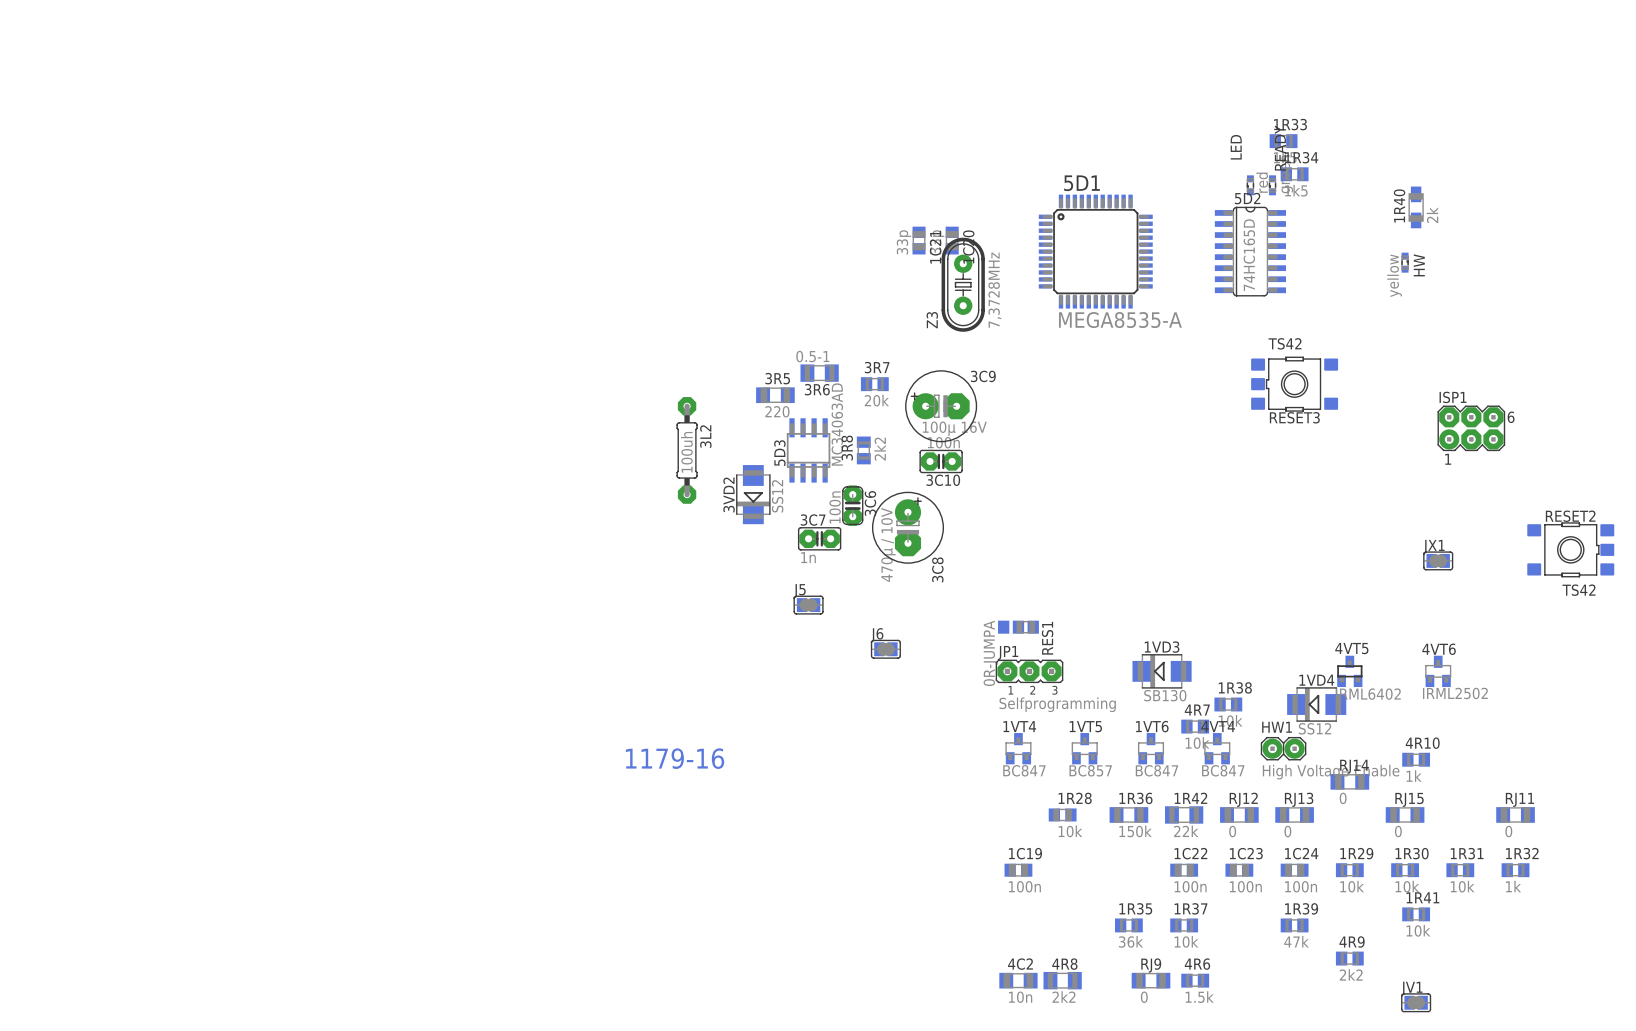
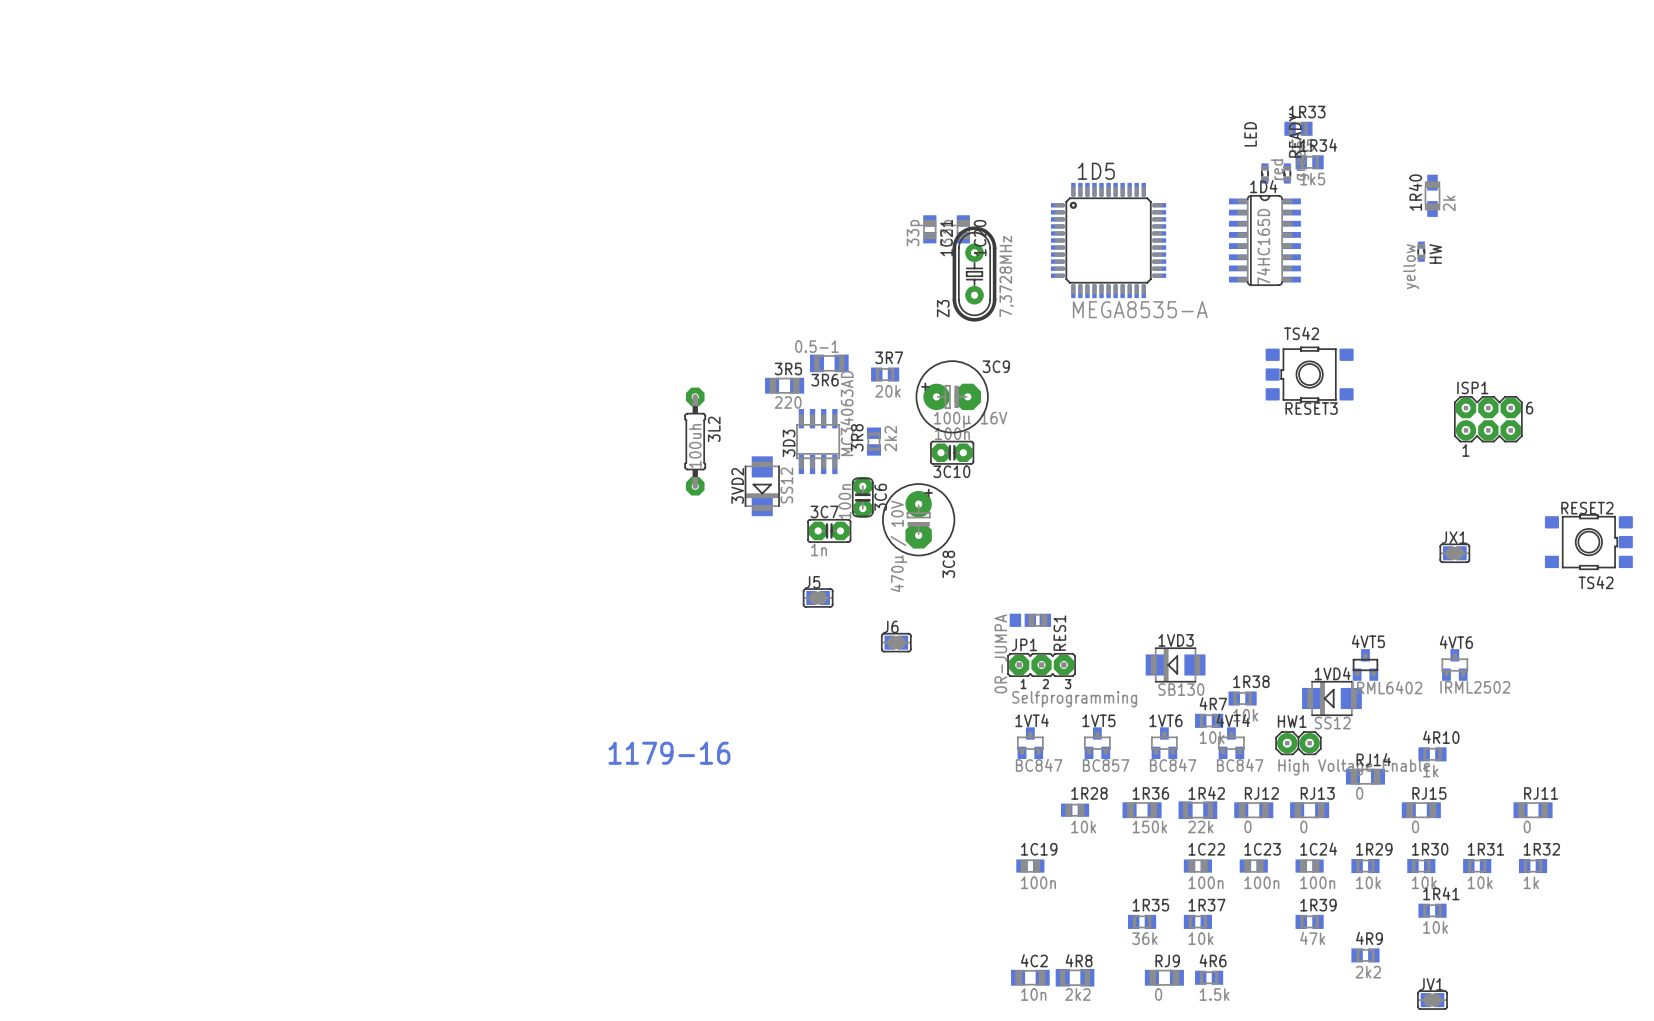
5D1 name: 5D1 (1081, 183) -> 1D5 (1096, 171)
5D2 name: 5D2 (1247, 198) -> 1D4 (1263, 186)
5D3 name: 5D3 (779, 453) -> 3D3 (789, 443)

